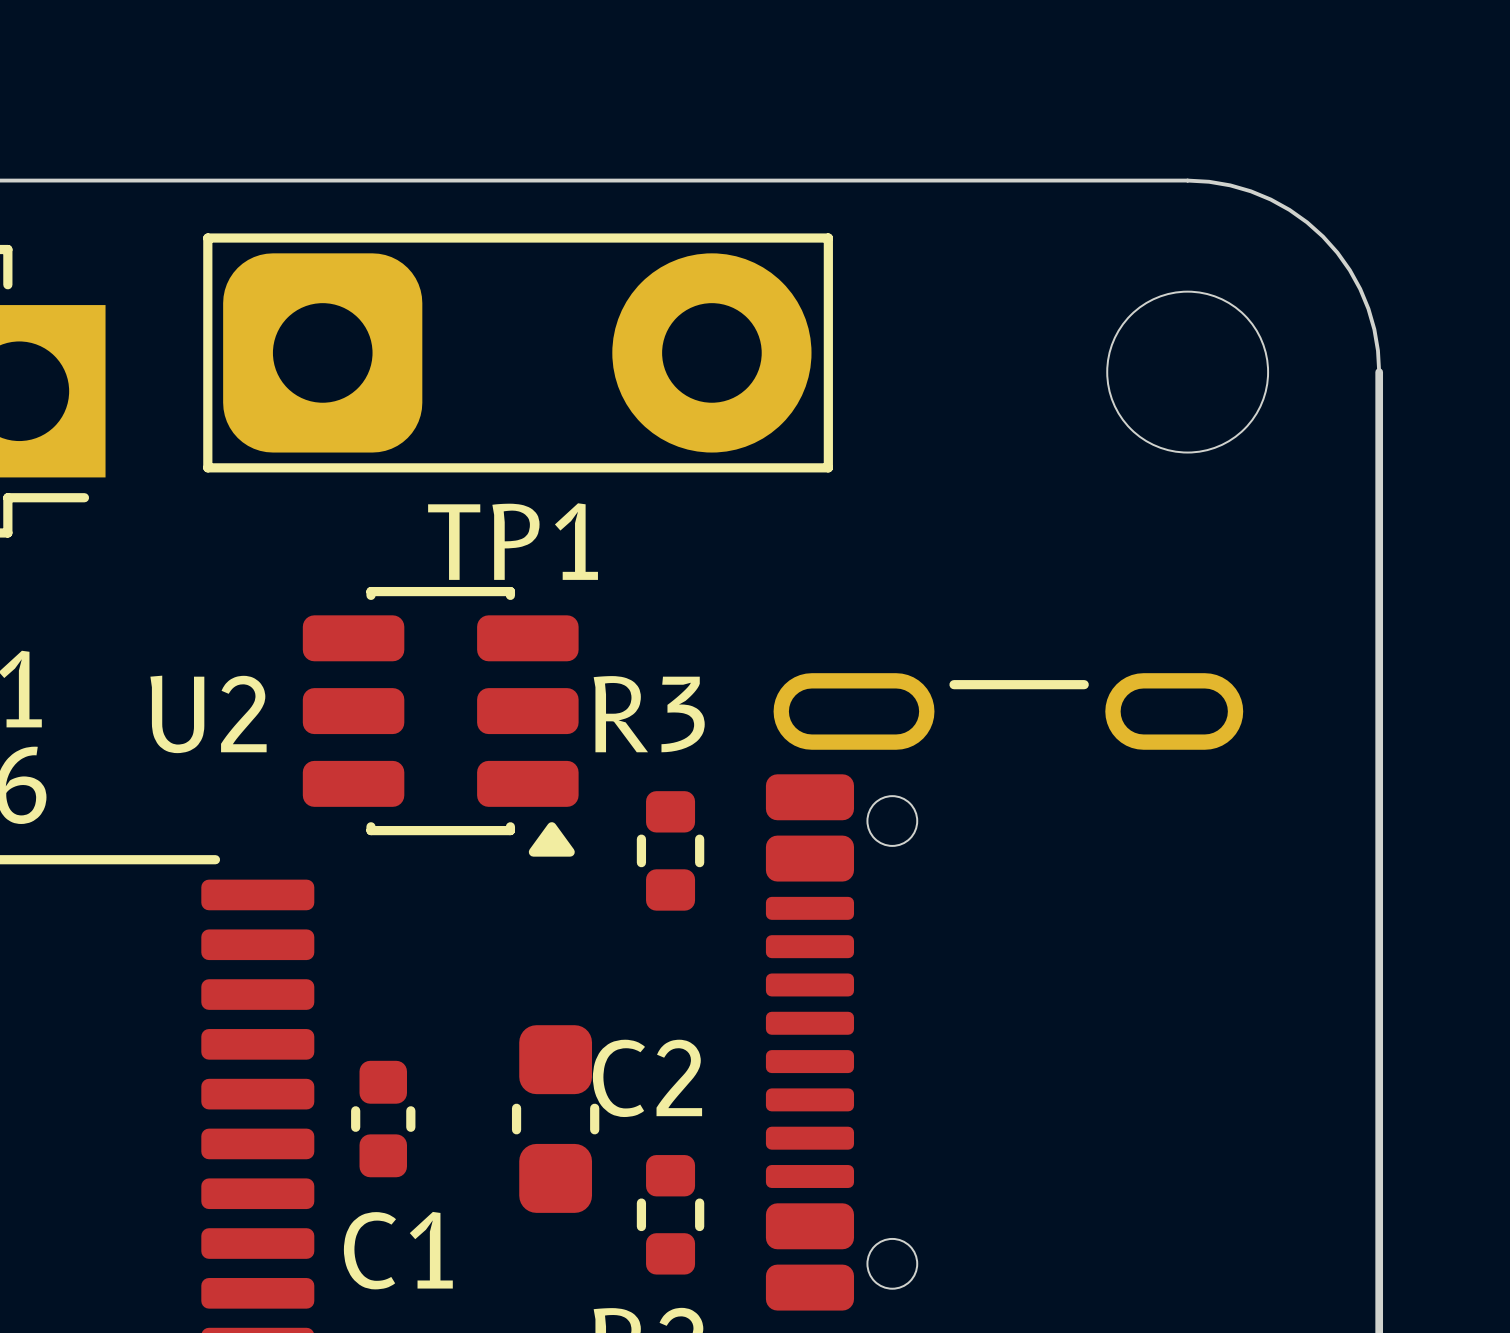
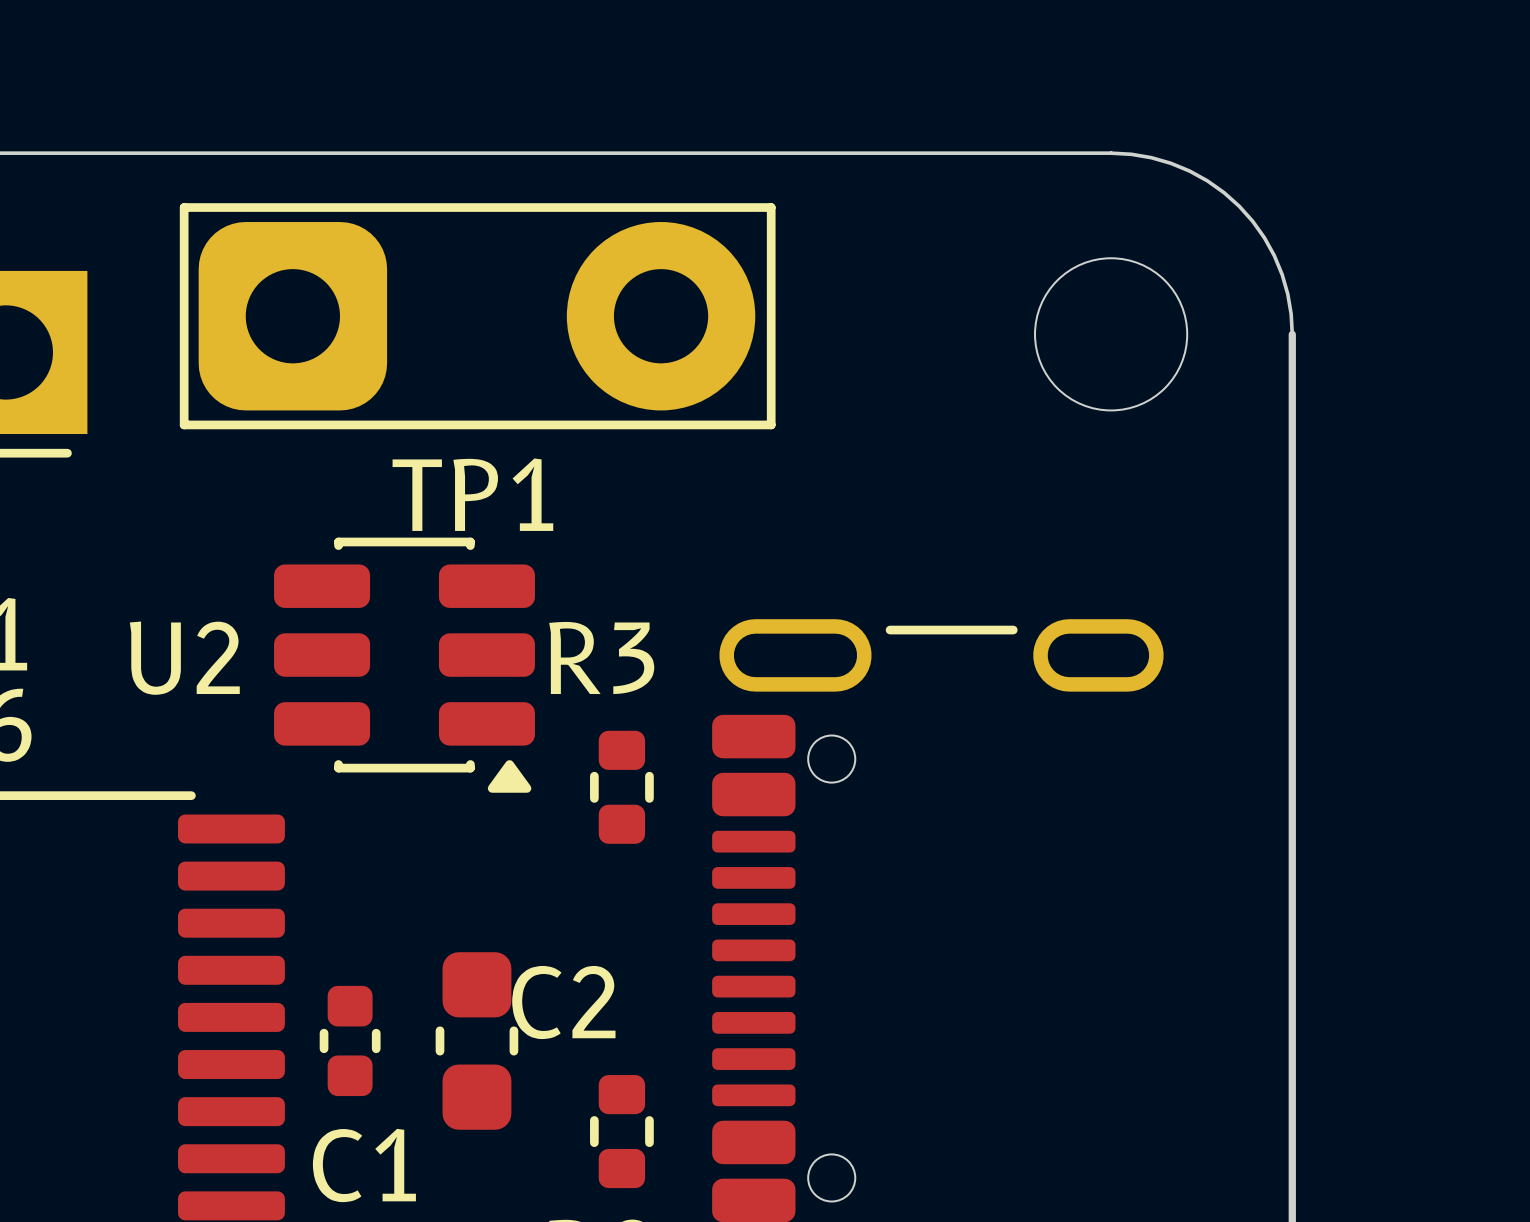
C2 position: (555, 1119) -> (476, 1040)

